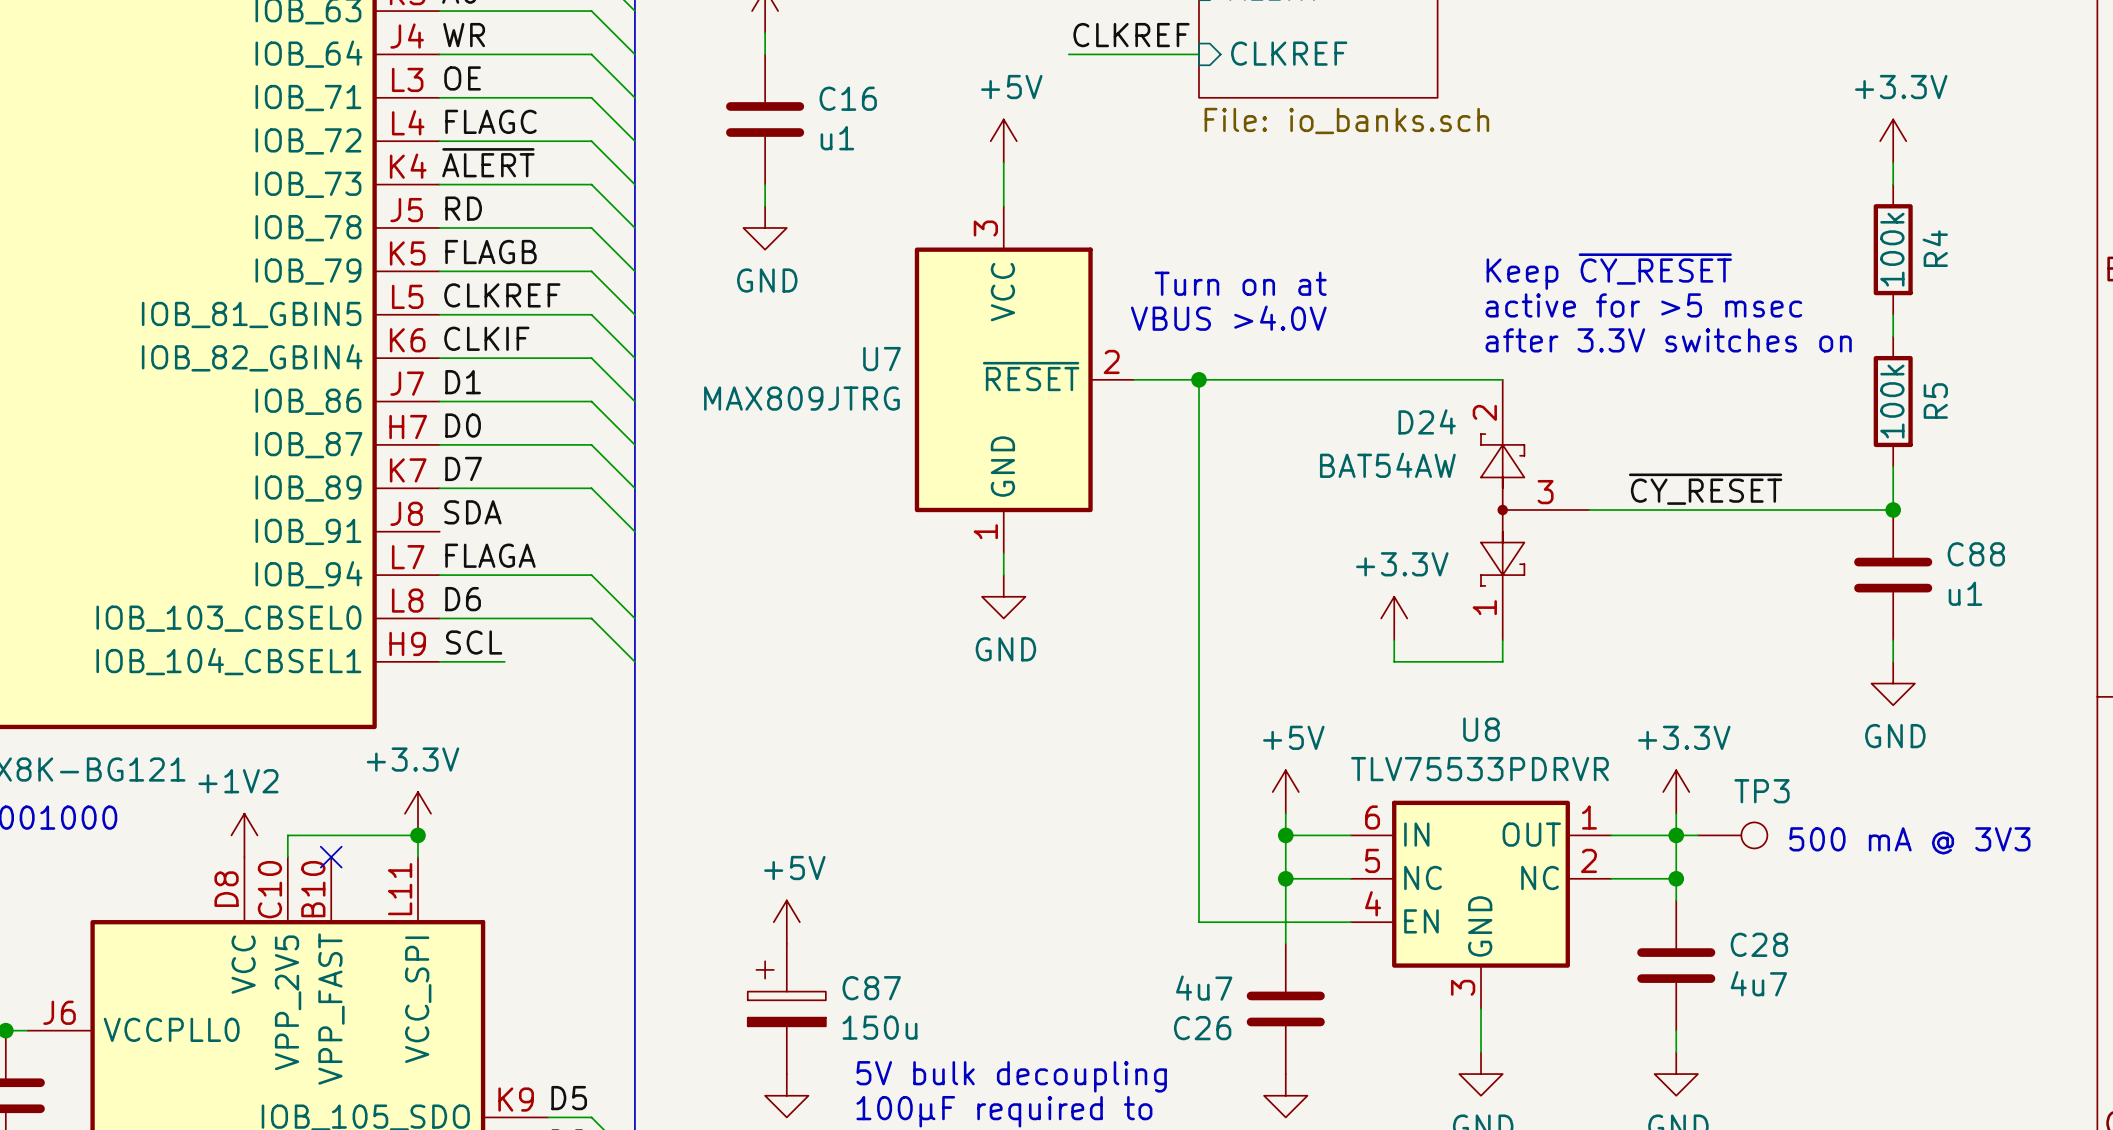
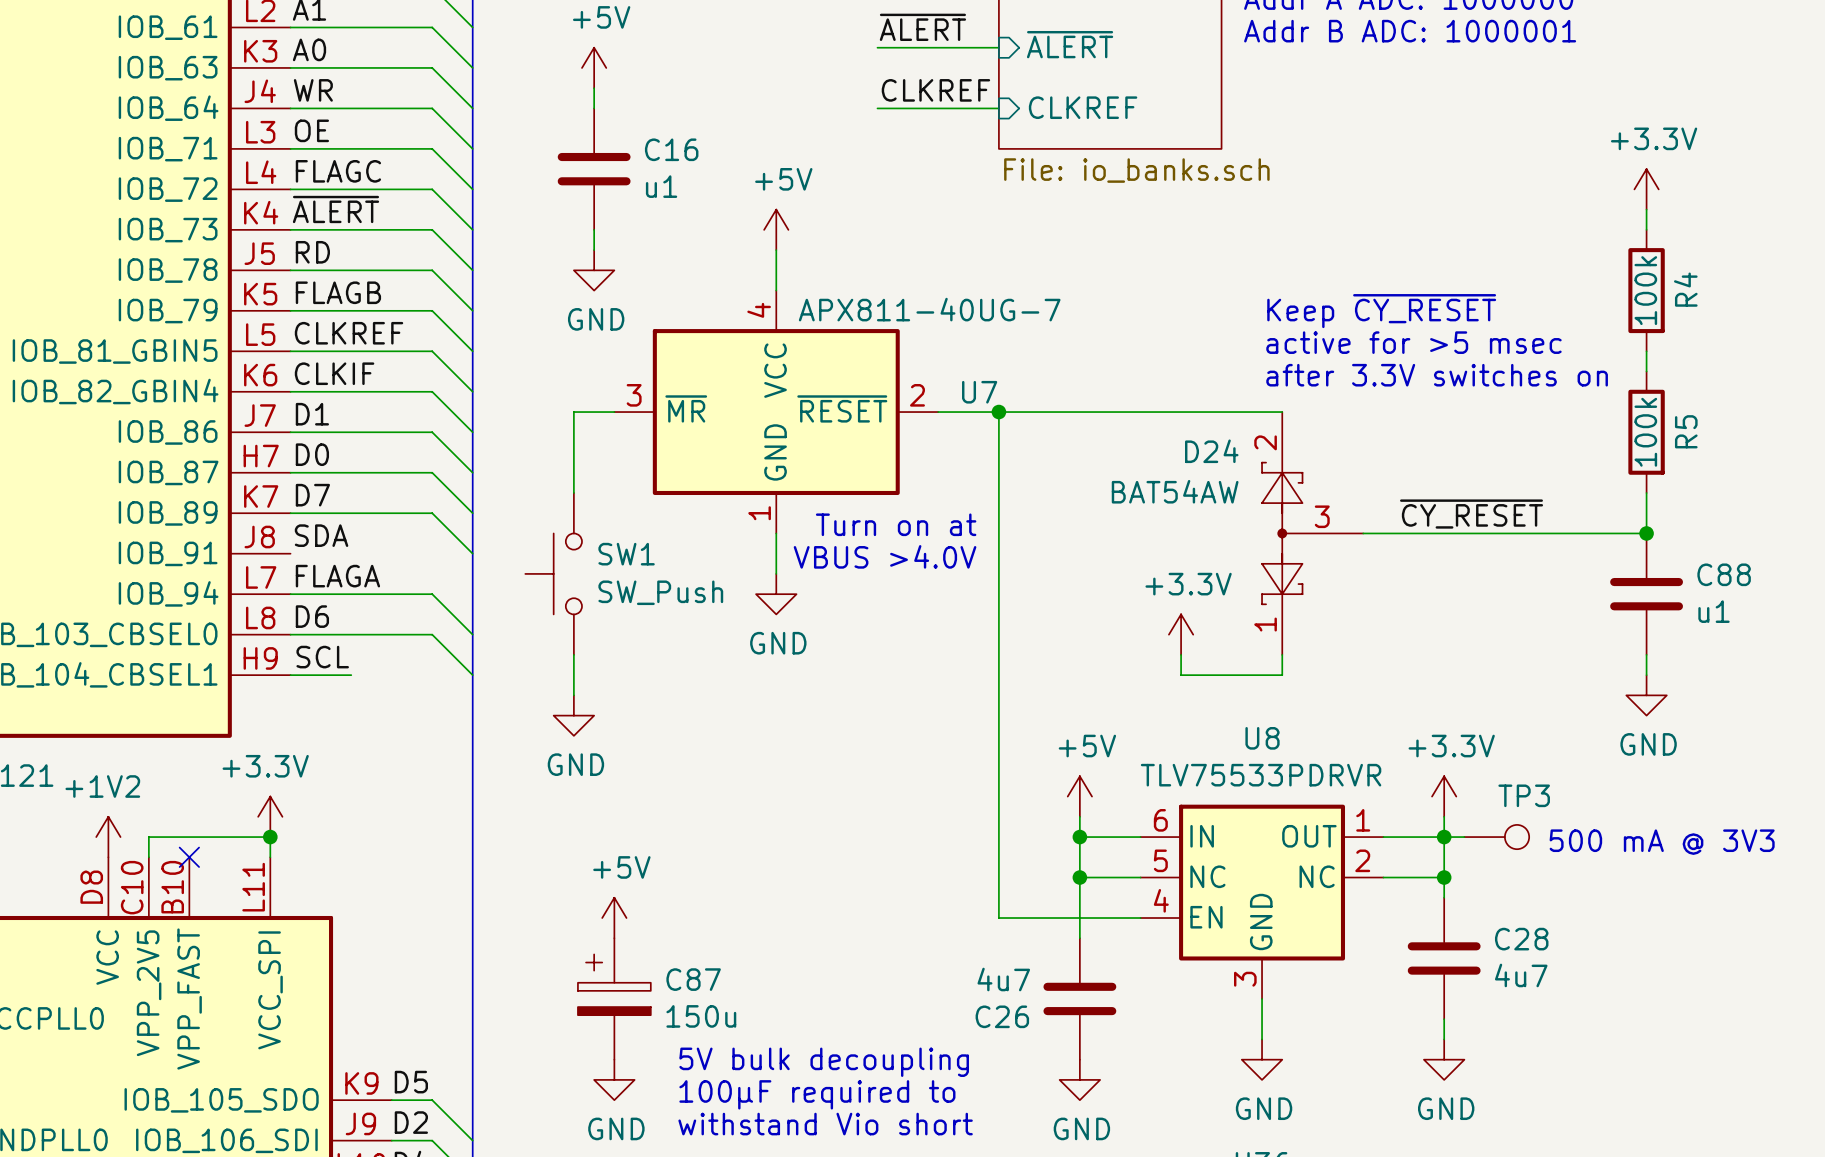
power symbol position: +5V (1003, 141) -> +5V (776, 229)
wire: (1003, 162) (1003, 206) -> (776, 250) (776, 290)
U7 symbol: [914, 206, 1134, 554] -> [614, 290, 939, 534]
text position: Turn on at (1240, 283) -> Turn on at (896, 524)
text position: VBUS >4.0V (1228, 318) -> VBUS >4.0V (885, 556)
U7 name position: U7 (882, 359) -> U7 (979, 392)
wire: none -> (614, 412) (573, 412) (573, 492)
U7 value: MAX809JTRG (801, 398) -> APX811-40UG-7 (929, 309)
wire: none -> (776, 533) (776, 573)
SW1: none -> SW_Push (553, 573)
wire: (1003, 553) (1003, 575) -> none
power symbol position: GND (1003, 596) -> GND (776, 594)
wire: none -> (573, 654) (573, 695)
power symbol: none -> GND (573, 715)

